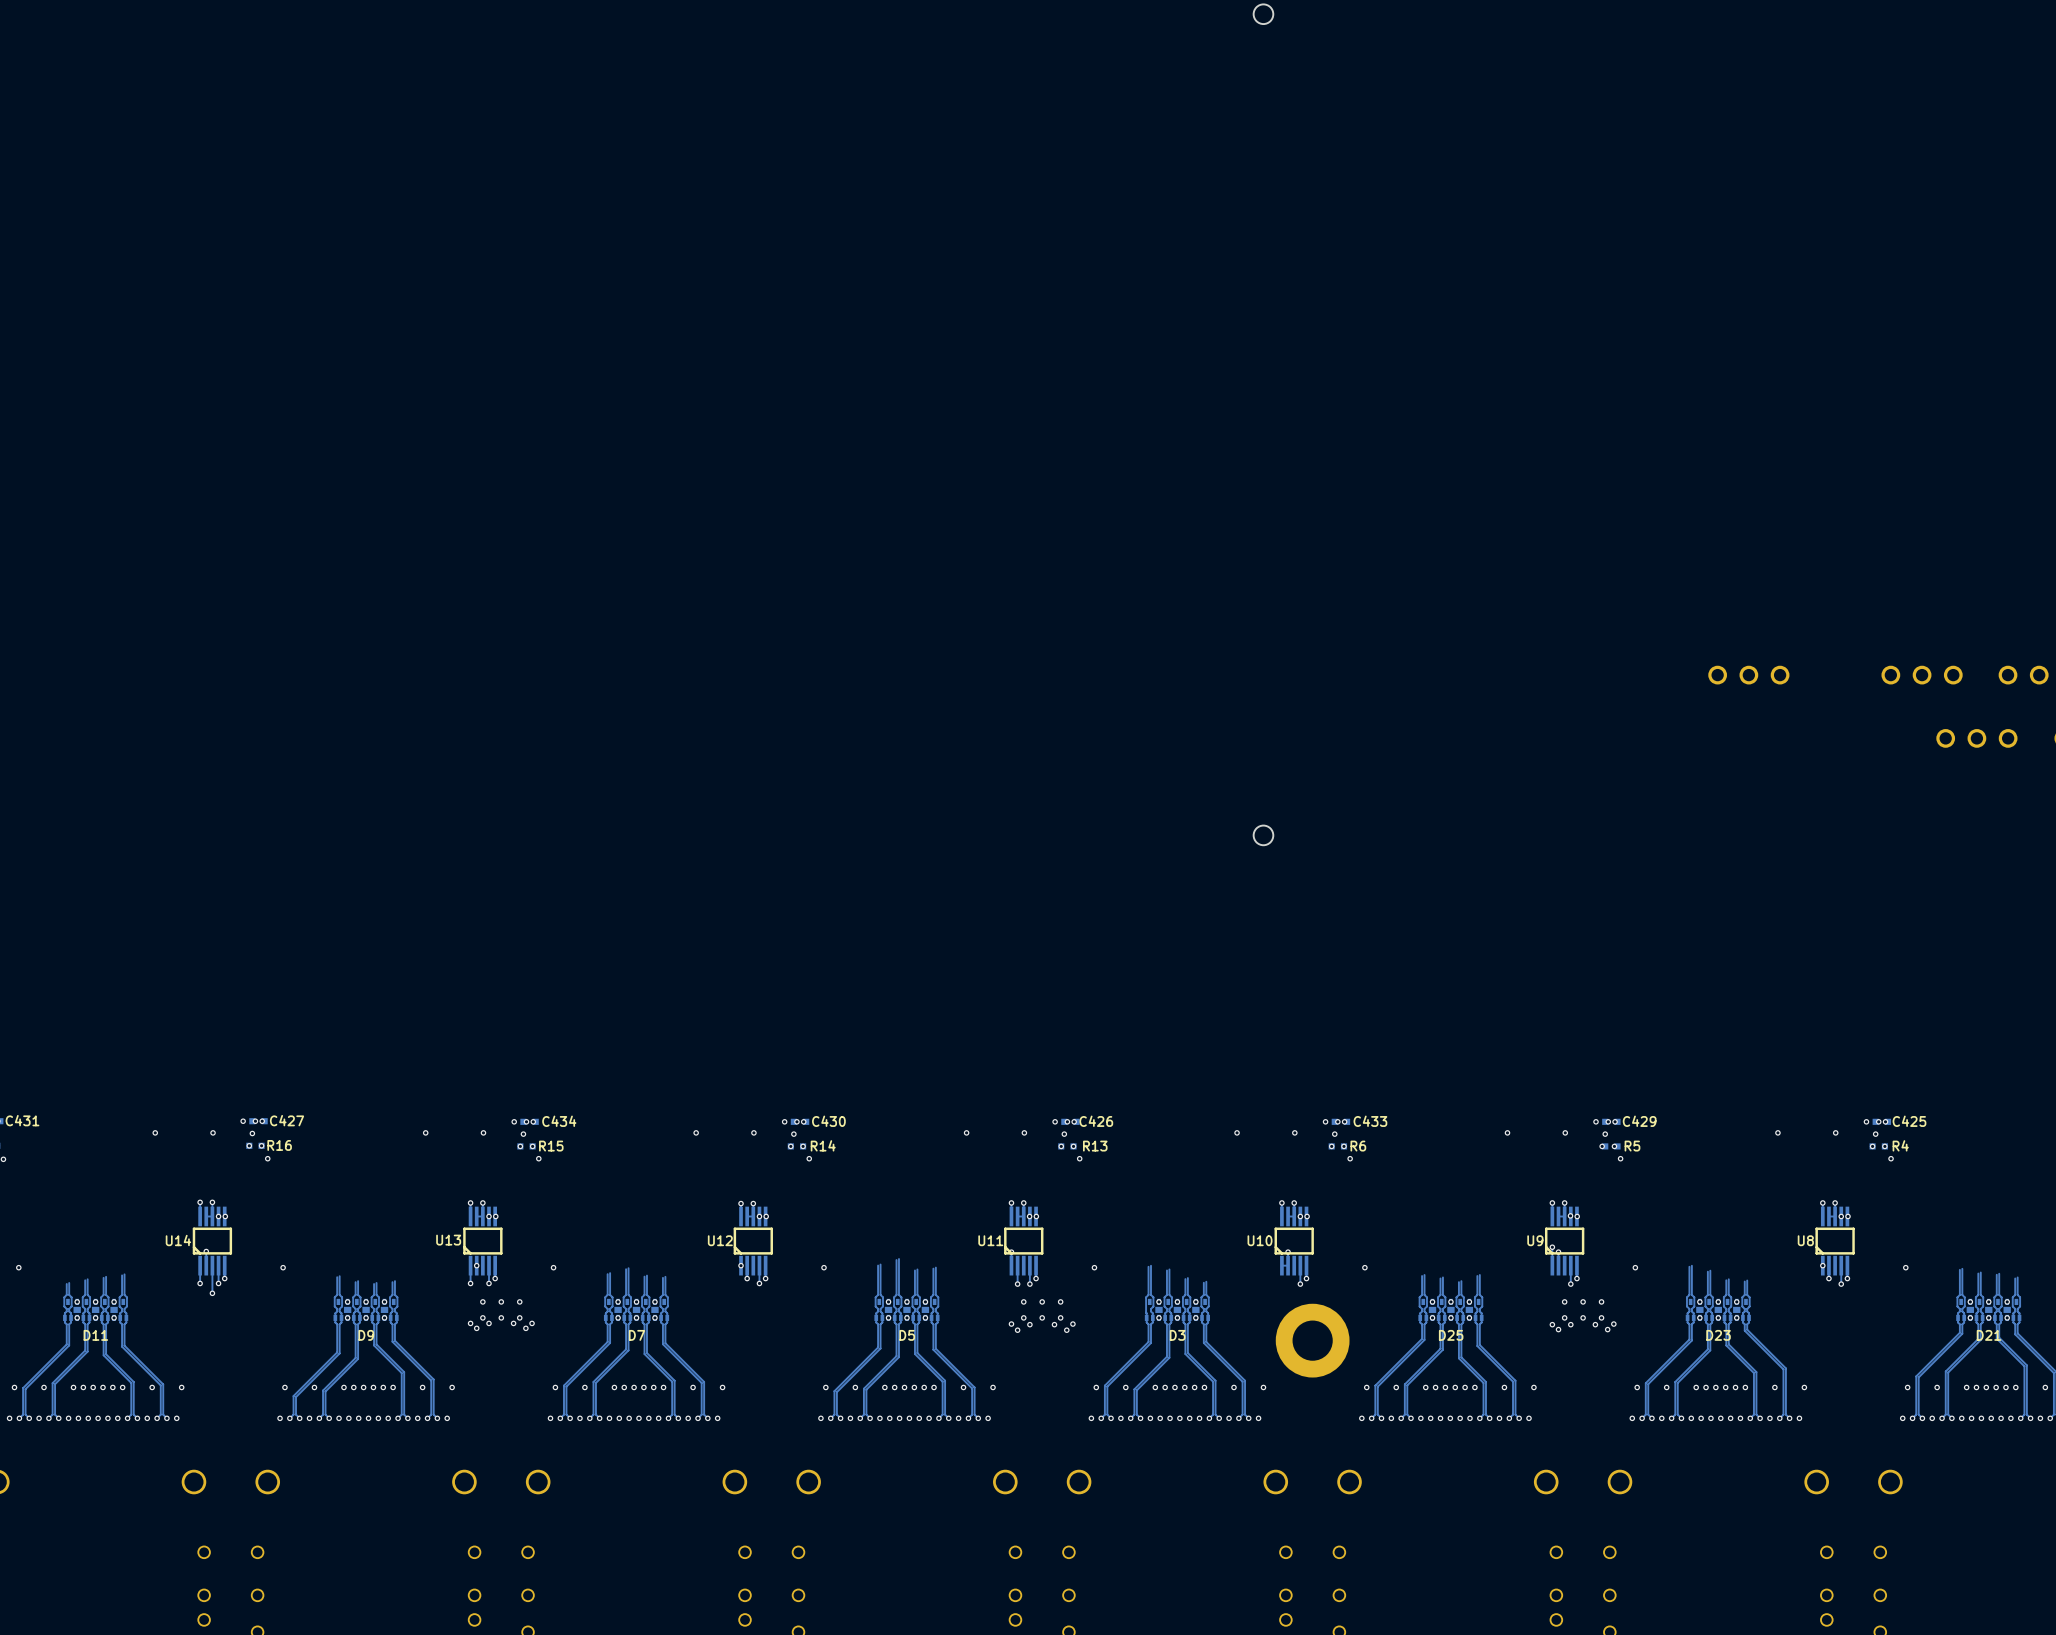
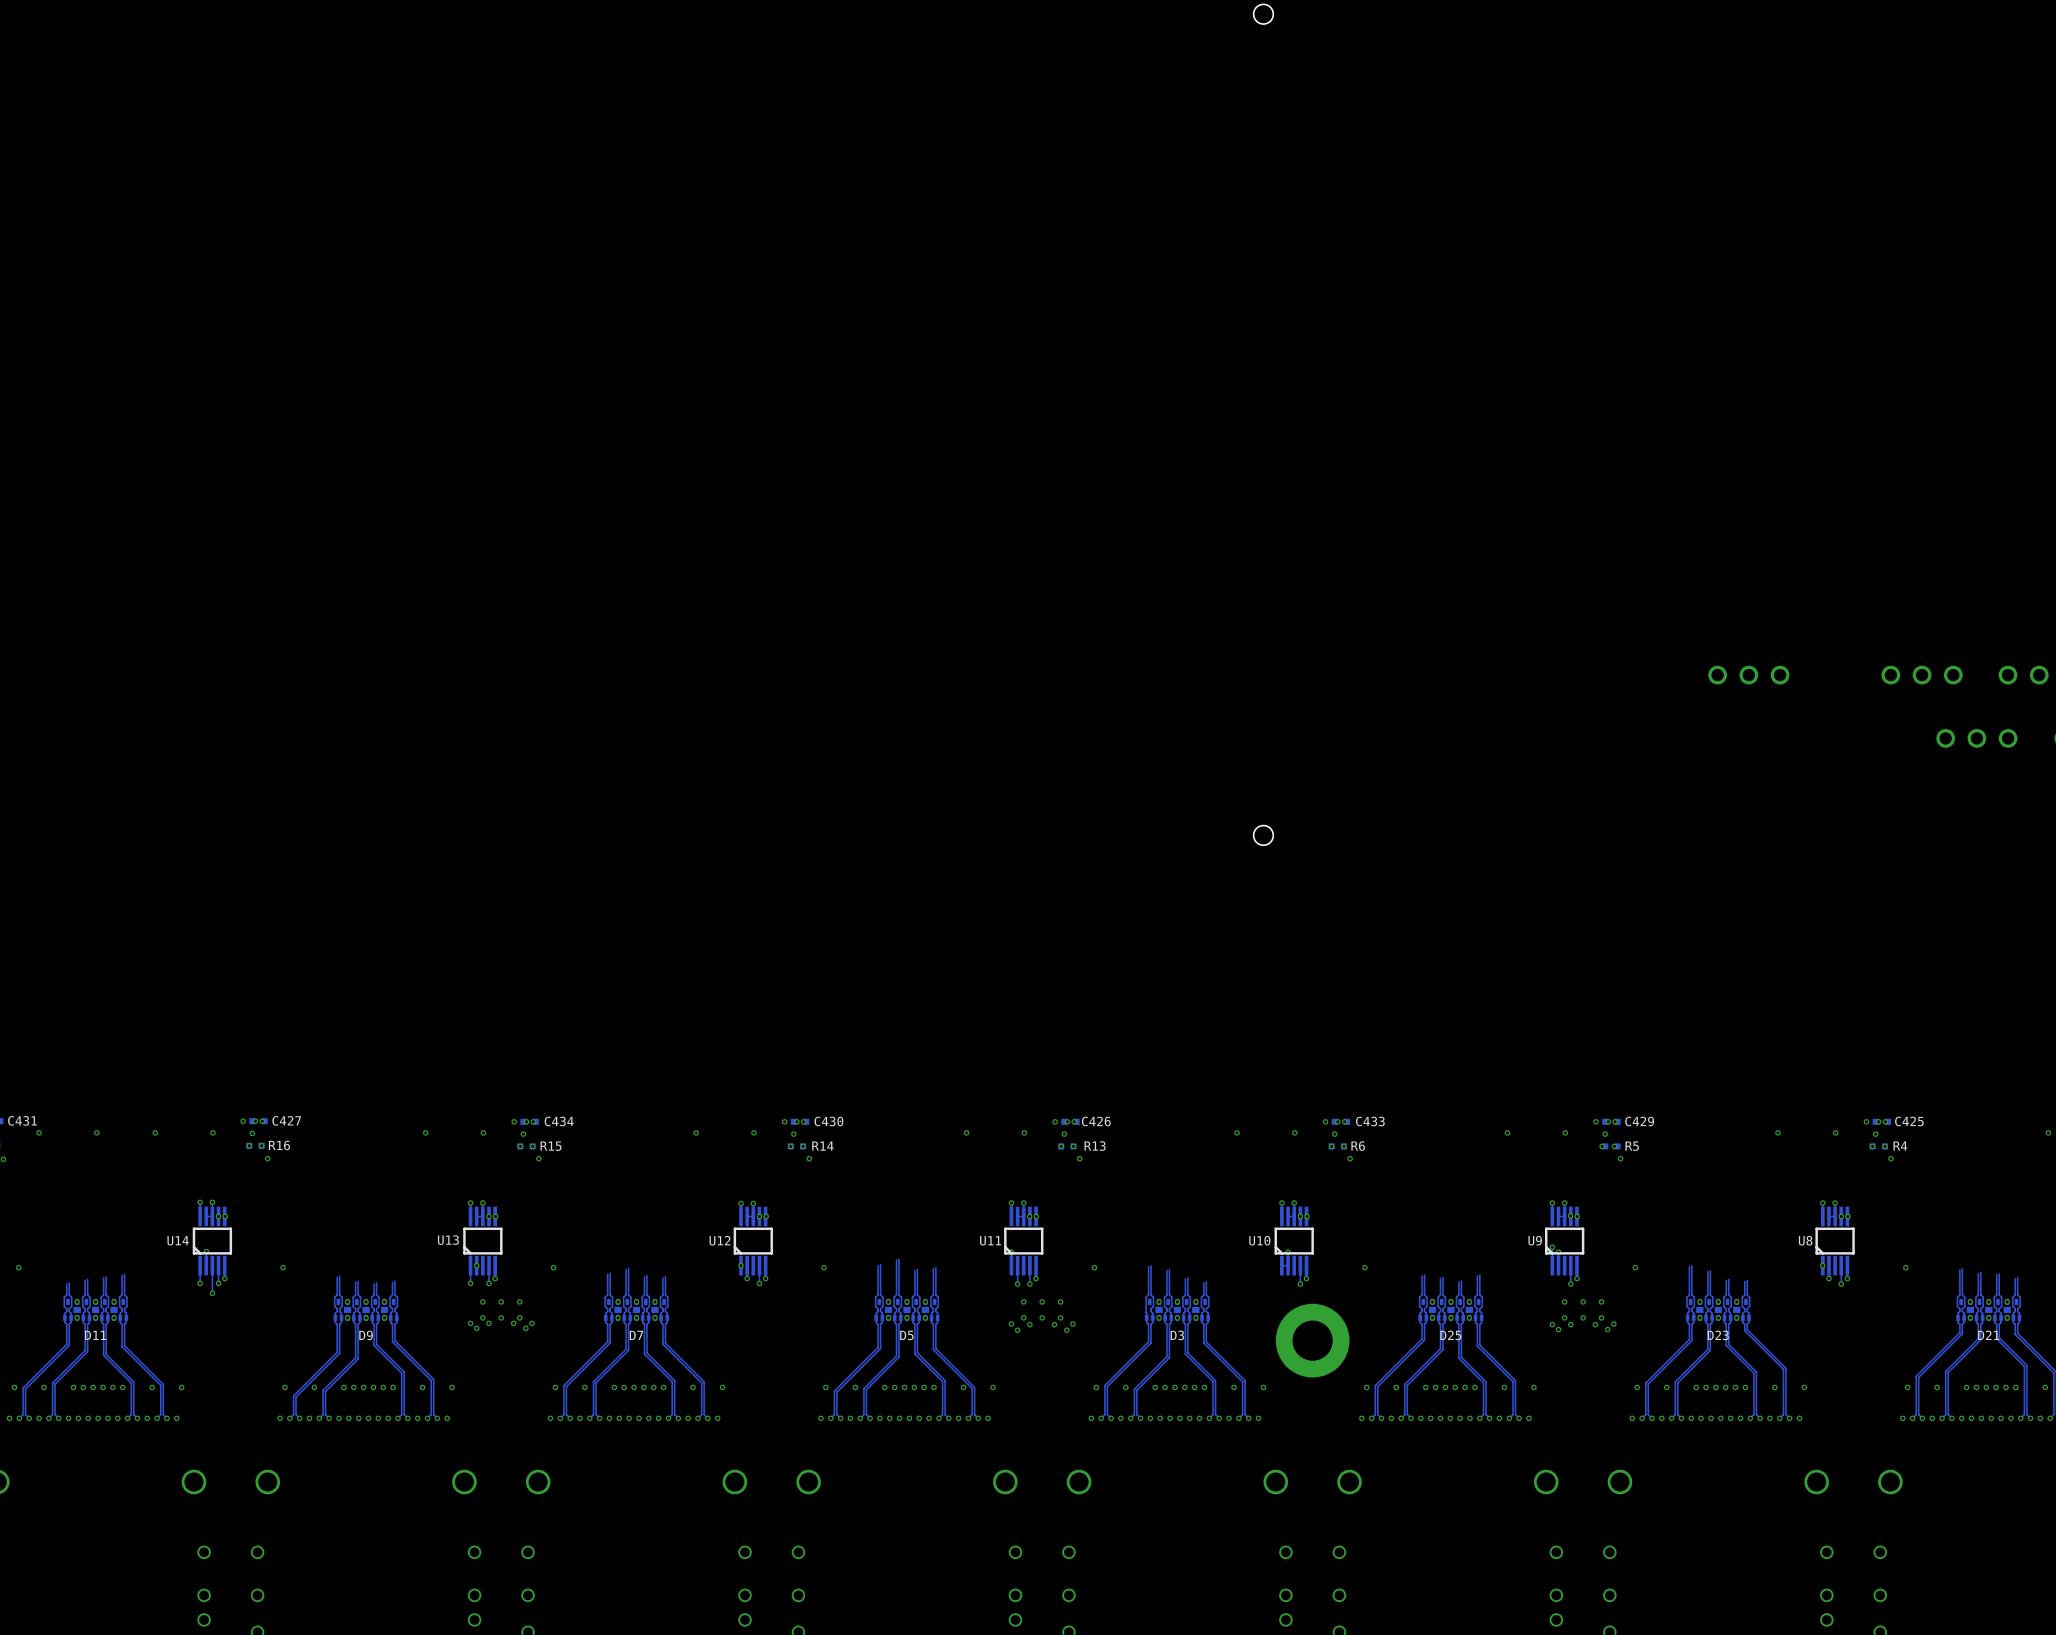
via: none -> (39, 1132)
via: none -> (96, 1132)
via: none -> (2048, 1132)

